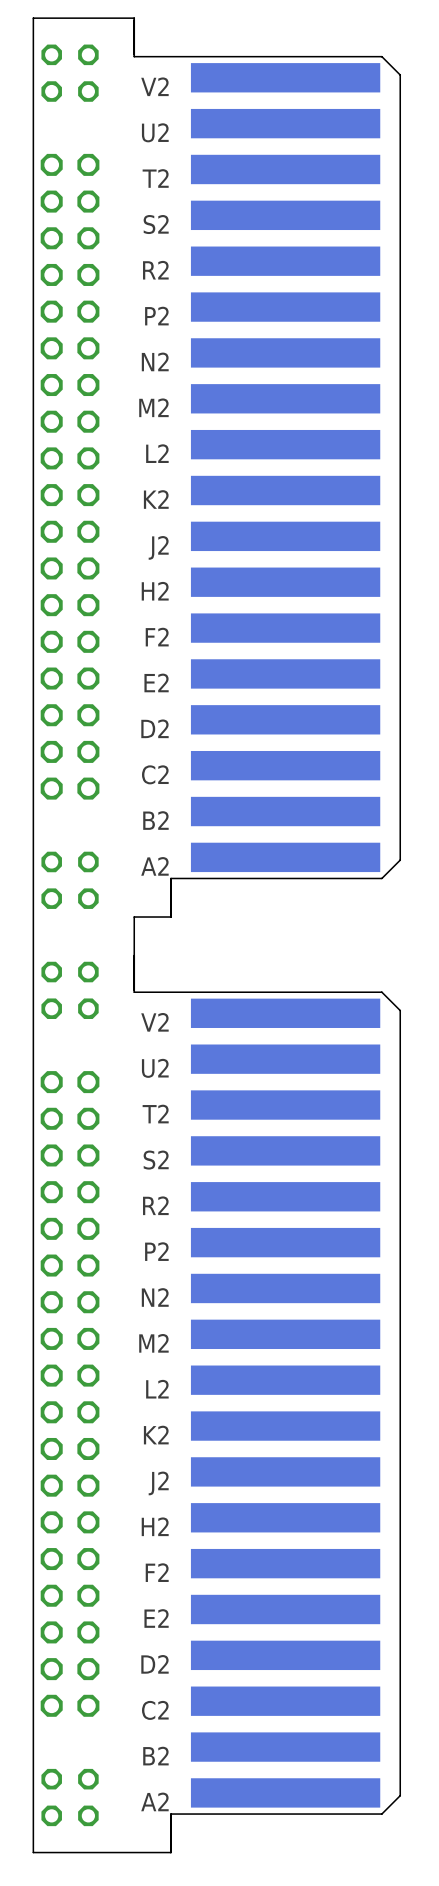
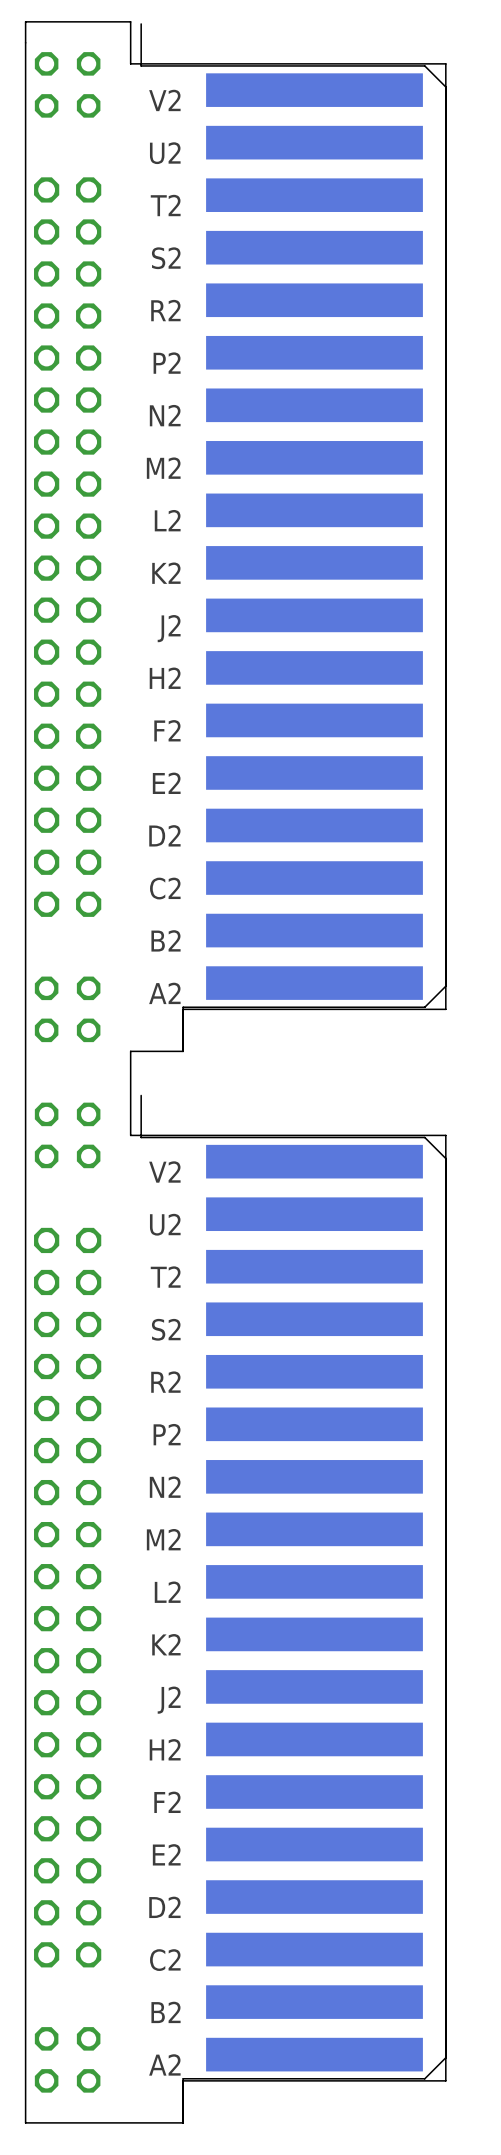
board edge: (125, 18) (134, 18) (134, 54) -> (130, 21) (130, 63) (445, 63) (445, 1009) (183, 1009)
board edge: (134, 917) (134, 990) -> (141, 1051) (130, 1051) (130, 1135) (445, 1135) (445, 2080) (183, 2080)

